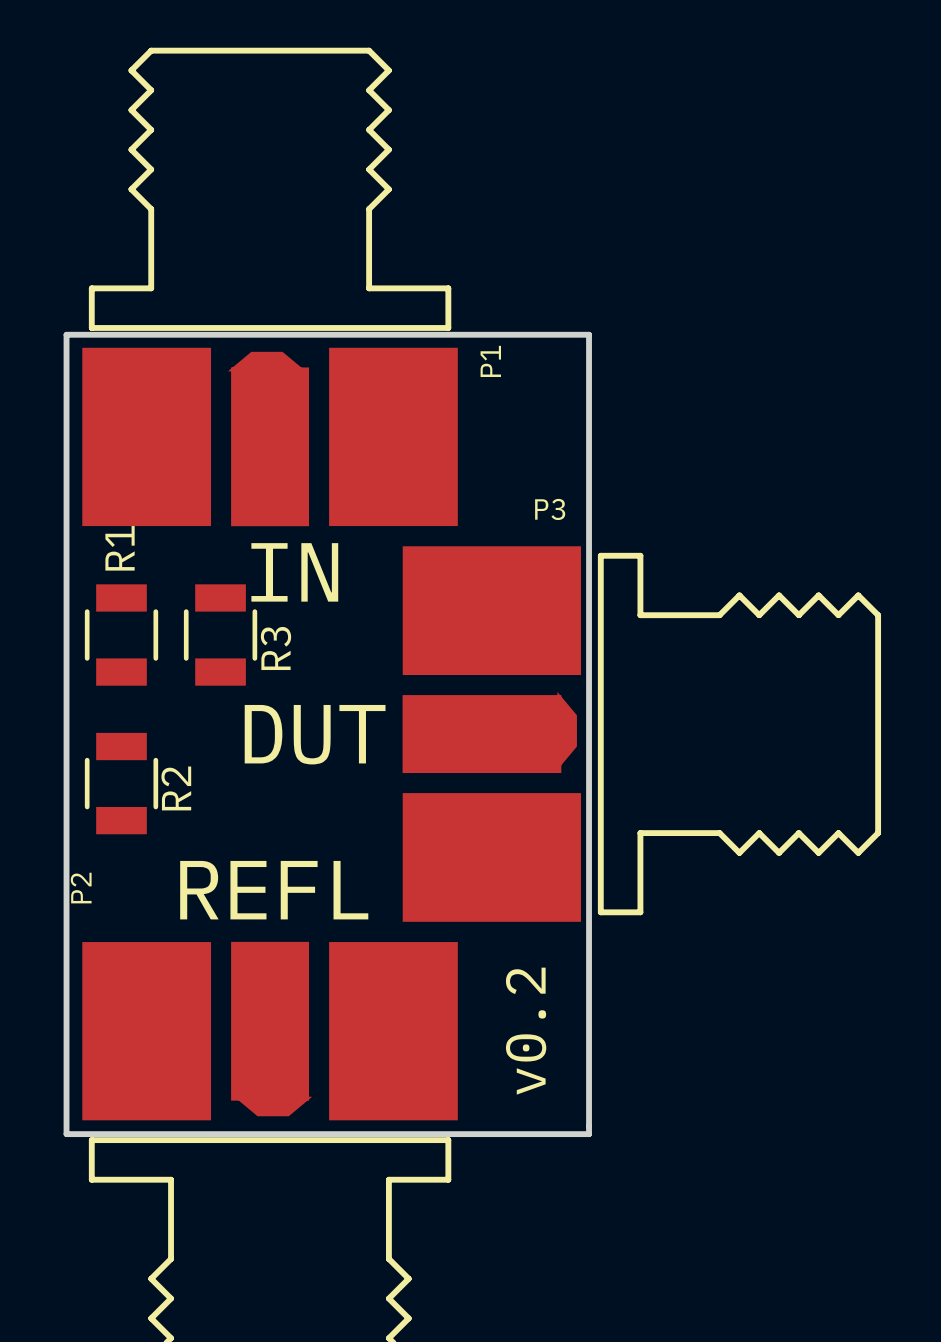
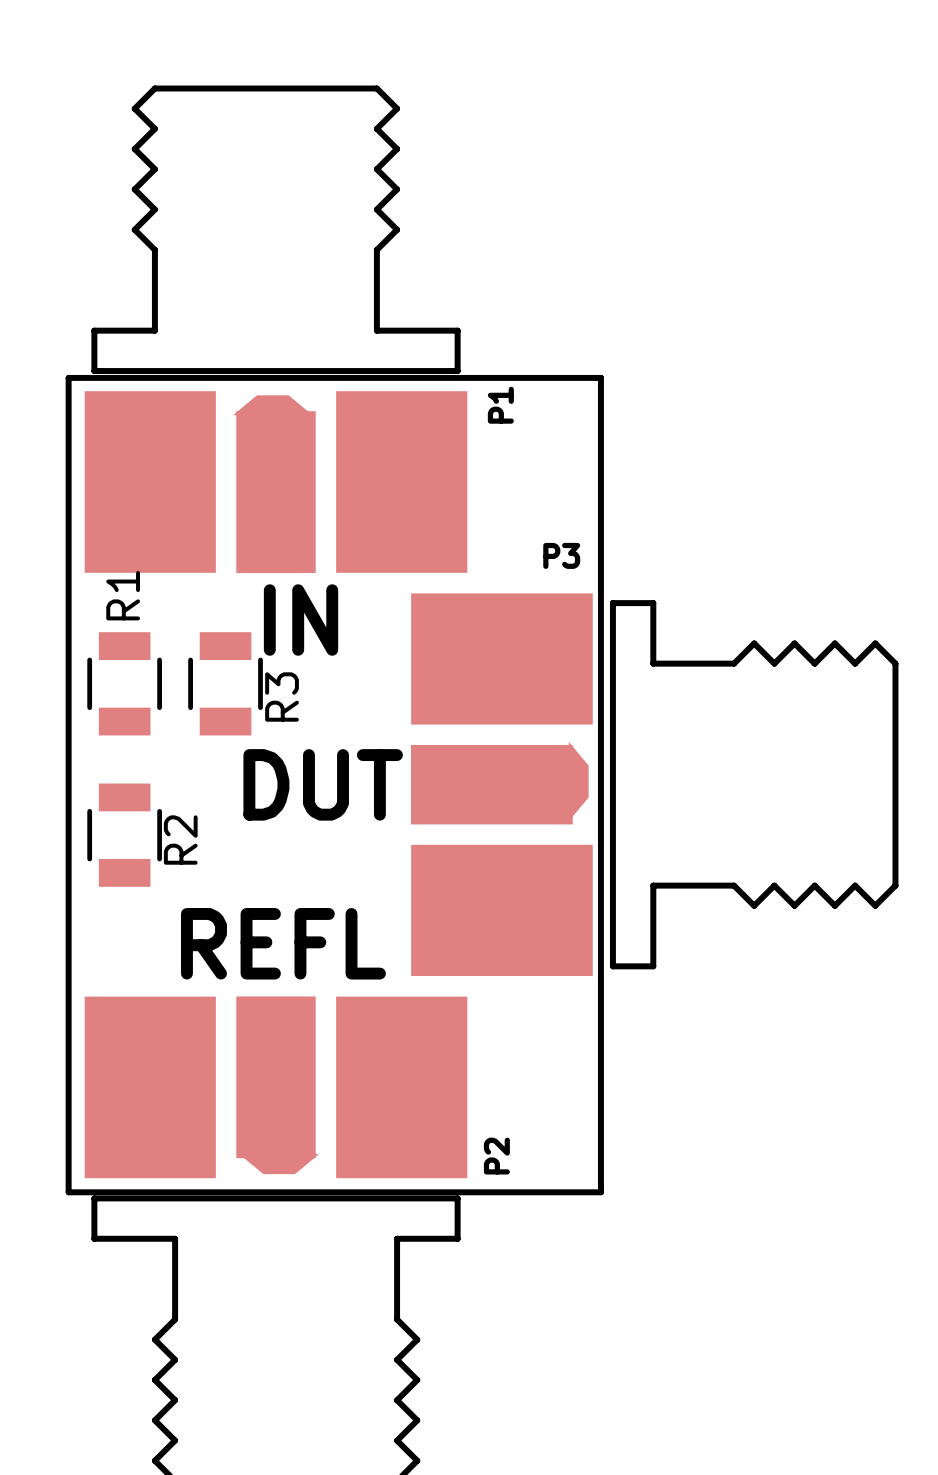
P2 name position: P2 (81, 888) -> P2 (496, 1156)
text: v0.2 (526, 1031) -> none

